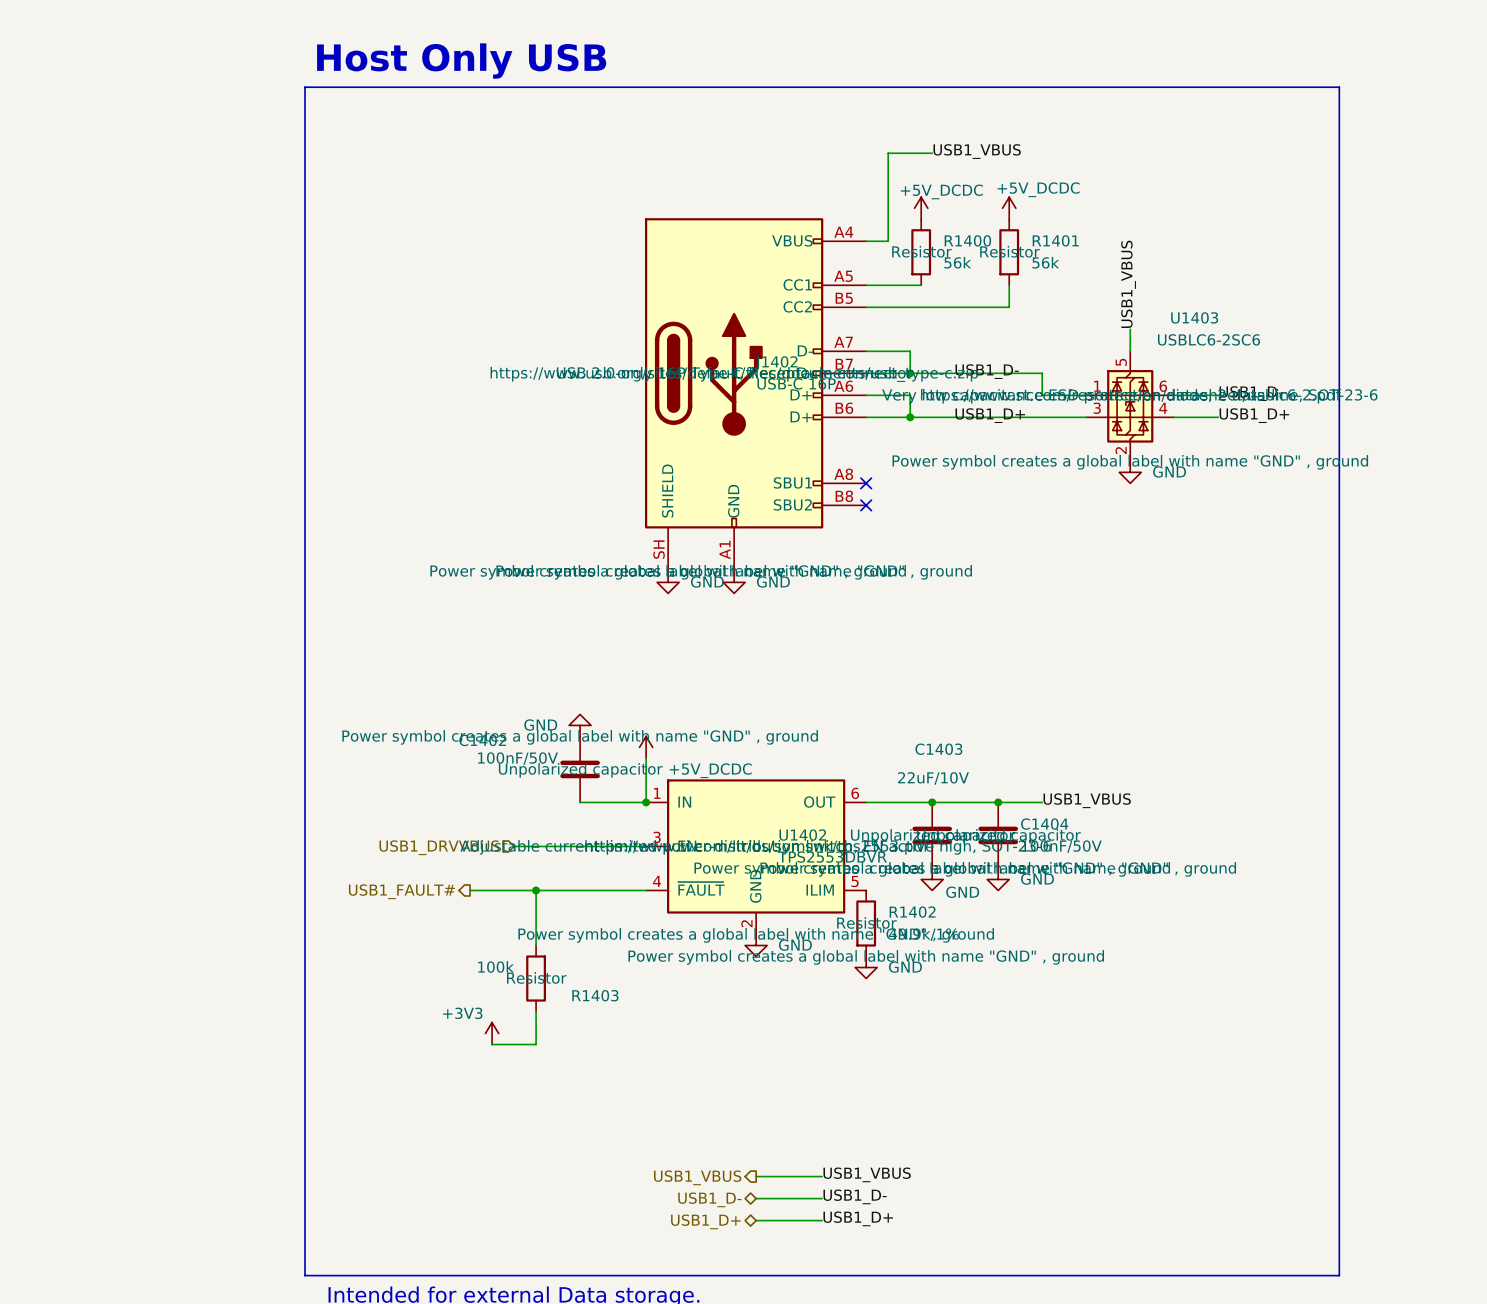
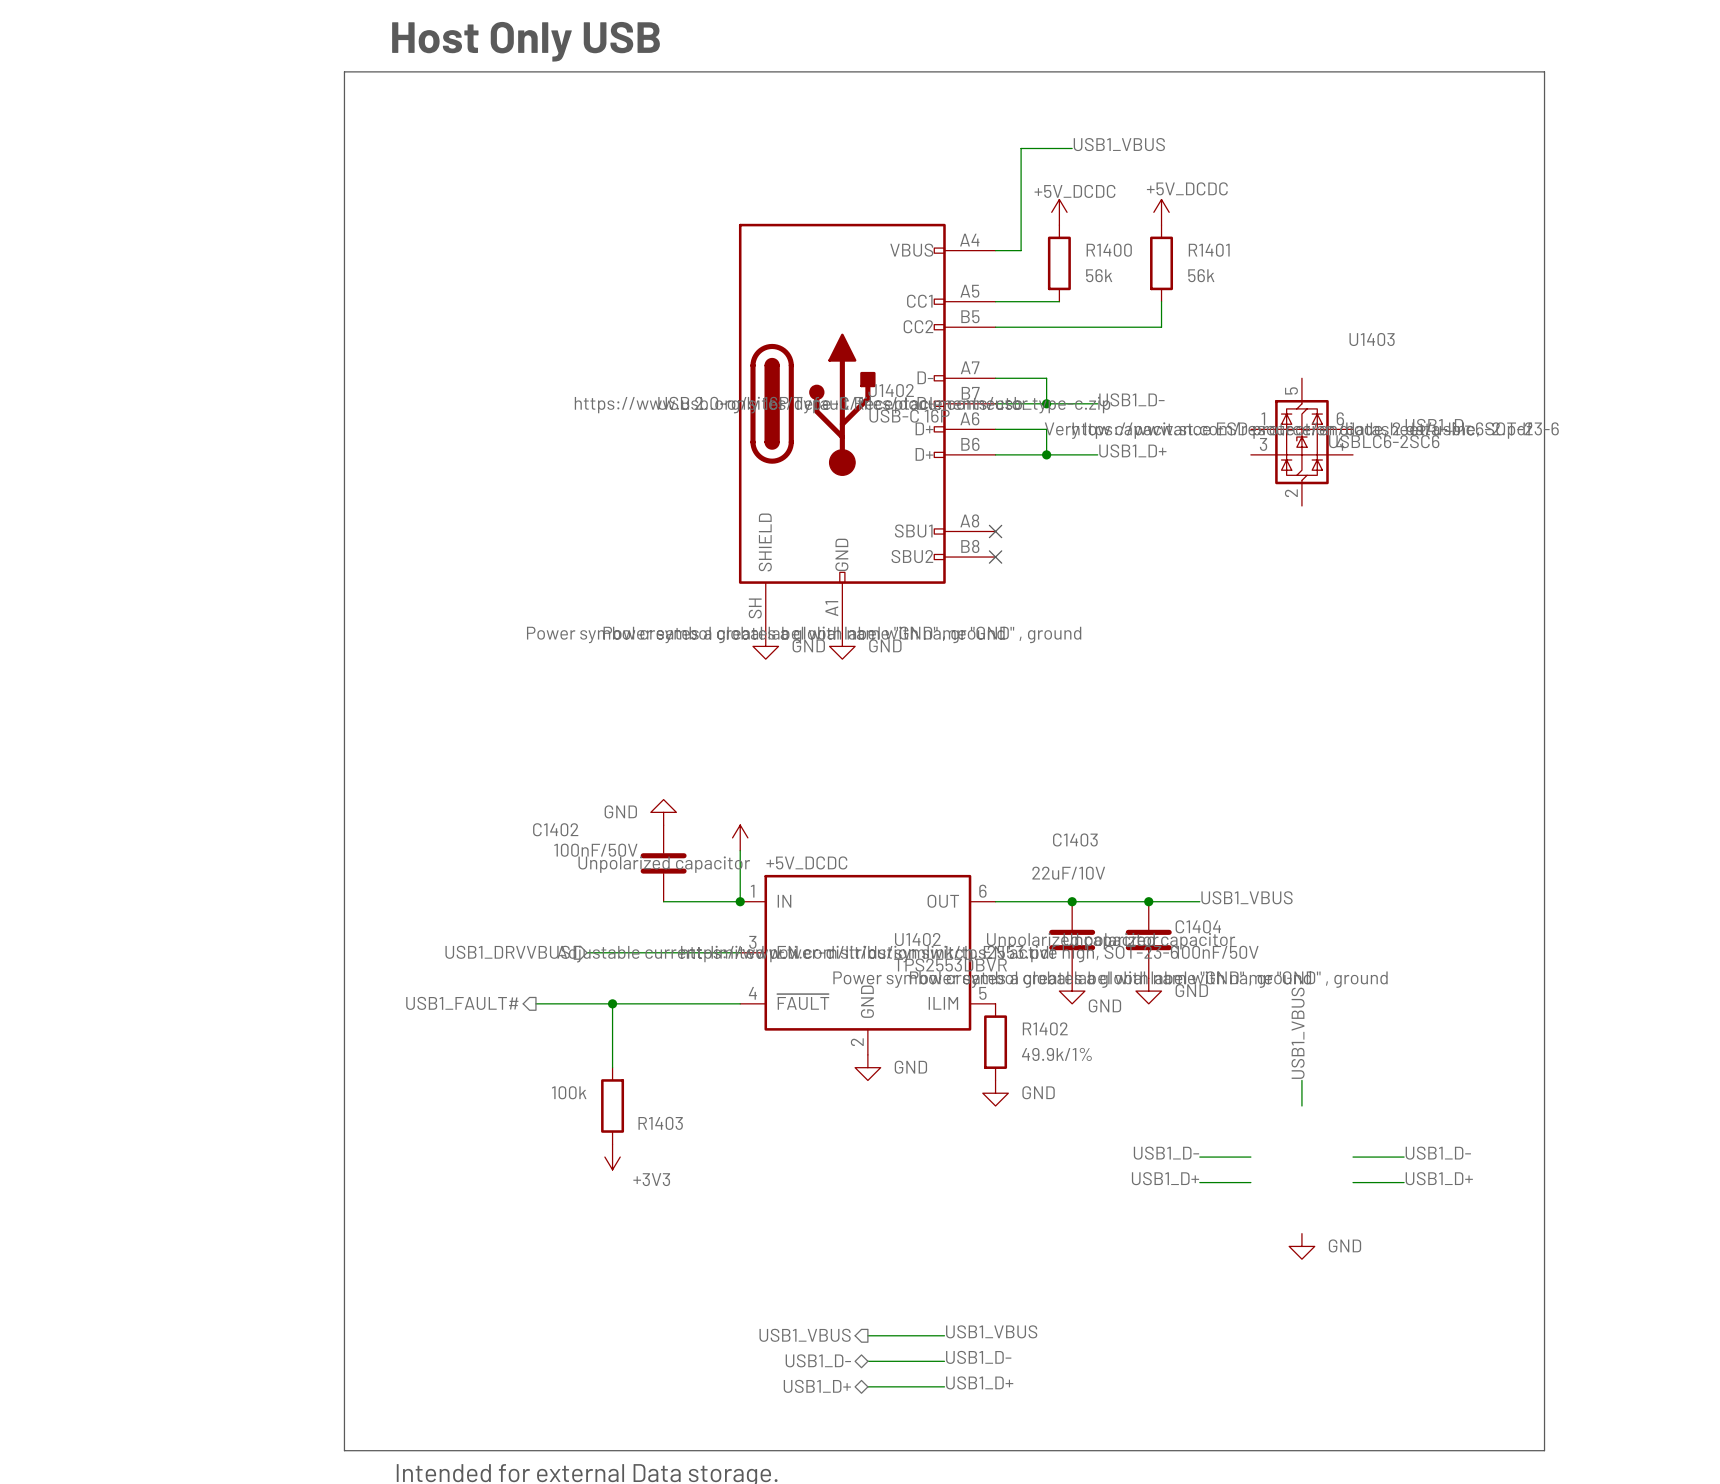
R1400 text: Resistor (921, 251) -> none
R1401 text: Resistor (1009, 251) -> none
label: USB1_VBUS (1128, 284) -> none
wire: (1130, 329) (1130, 351) -> none
U1403 value position: USBLC6-2SC6 (1209, 339) -> USBLC6-2SC6 (1384, 441)
wire: (954, 373) (1042, 373) (1042, 395) (1086, 395) -> none
wire: (1174, 395) (1218, 395) -> none
label: USB1_D+ (1254, 415) -> none
wire: (954, 417) (1086, 417) -> none
wire: (1174, 417) (1218, 417) -> none
power symbol: GND (1130, 472) -> none
power symbol text: Power symbol creates a global label with name "GND" , ground (580, 737) -> none
label: none -> USB1_VBUS (1298, 1033)
R1402 text: Resistor (866, 922) -> none
power symbol text: Power symbol creates a global label with name "GND" , ground (756, 935) -> none
wire: none -> (1301, 1080) (1301, 1105)
power symbol text: Power symbol creates a global label with name "GND" , ground (866, 957) -> none
R1403 text: Resistor (536, 977) -> none
R1403 name position: R1403 (595, 995) -> R1403 (660, 1123)
wire: (536, 1011) (536, 1044) (492, 1044) -> none
label: none -> USB1_D- (1166, 1153)
label: none -> USB1_D- (1438, 1153)
wire: none -> (1199, 1157) (1250, 1157)
wire: none -> (1353, 1157) (1404, 1157)
power symbol rotation: 0° (492, 1033) -> 180° (612, 1157)
power symbol position: +3V3 (492, 1033) -> +3V3 (612, 1157)
label: none -> USB1_D+ (1165, 1178)
label: none -> USB1_D+ (1439, 1178)
wire: none -> (1199, 1182) (1250, 1182)
wire: none -> (1353, 1182) (1404, 1182)
power symbol: none -> GND (1301, 1246)

